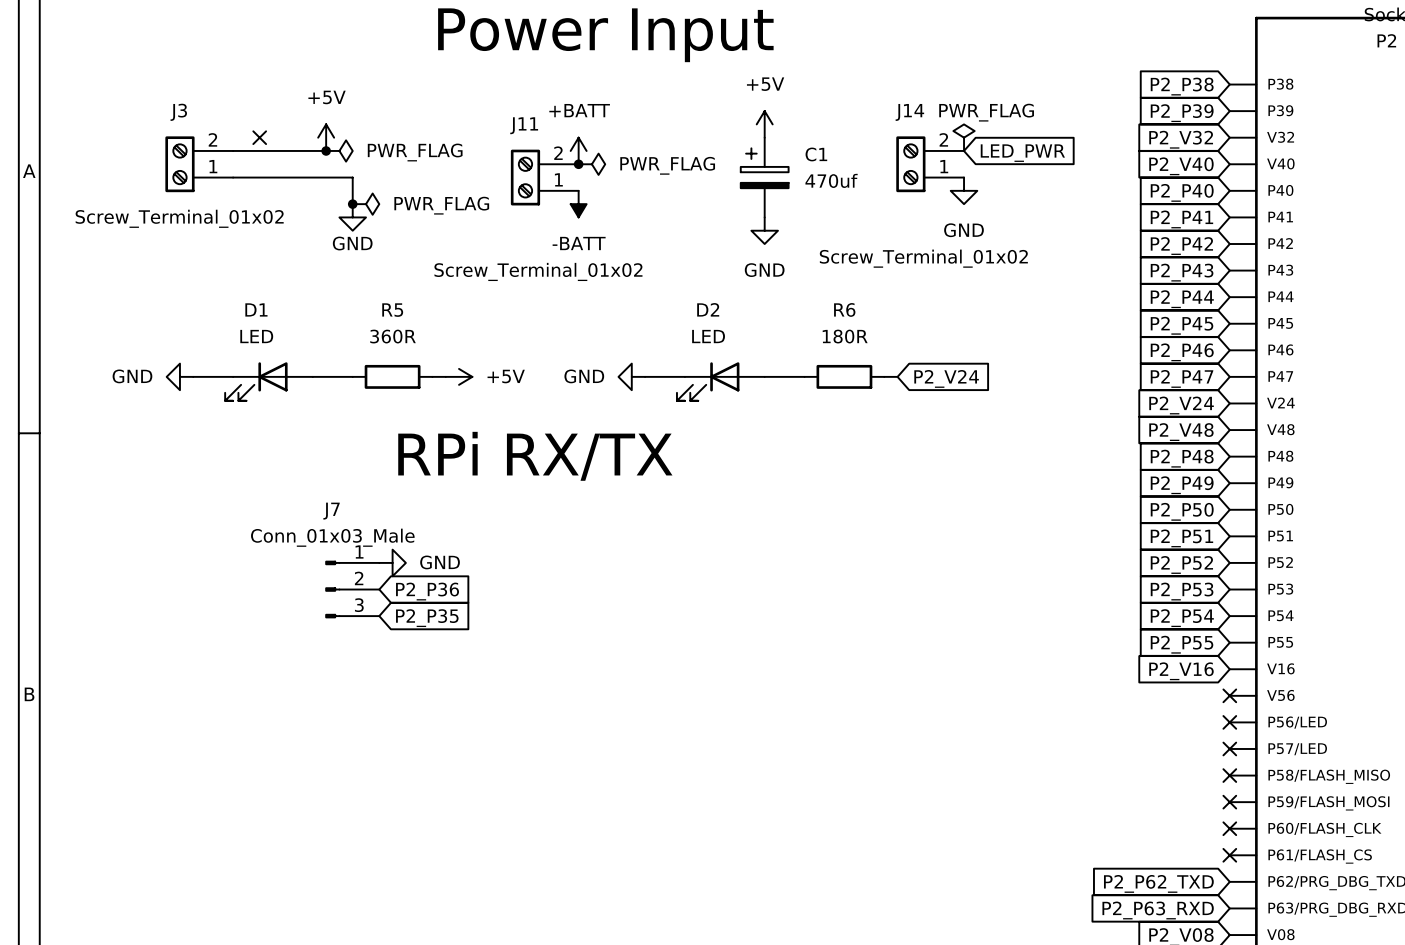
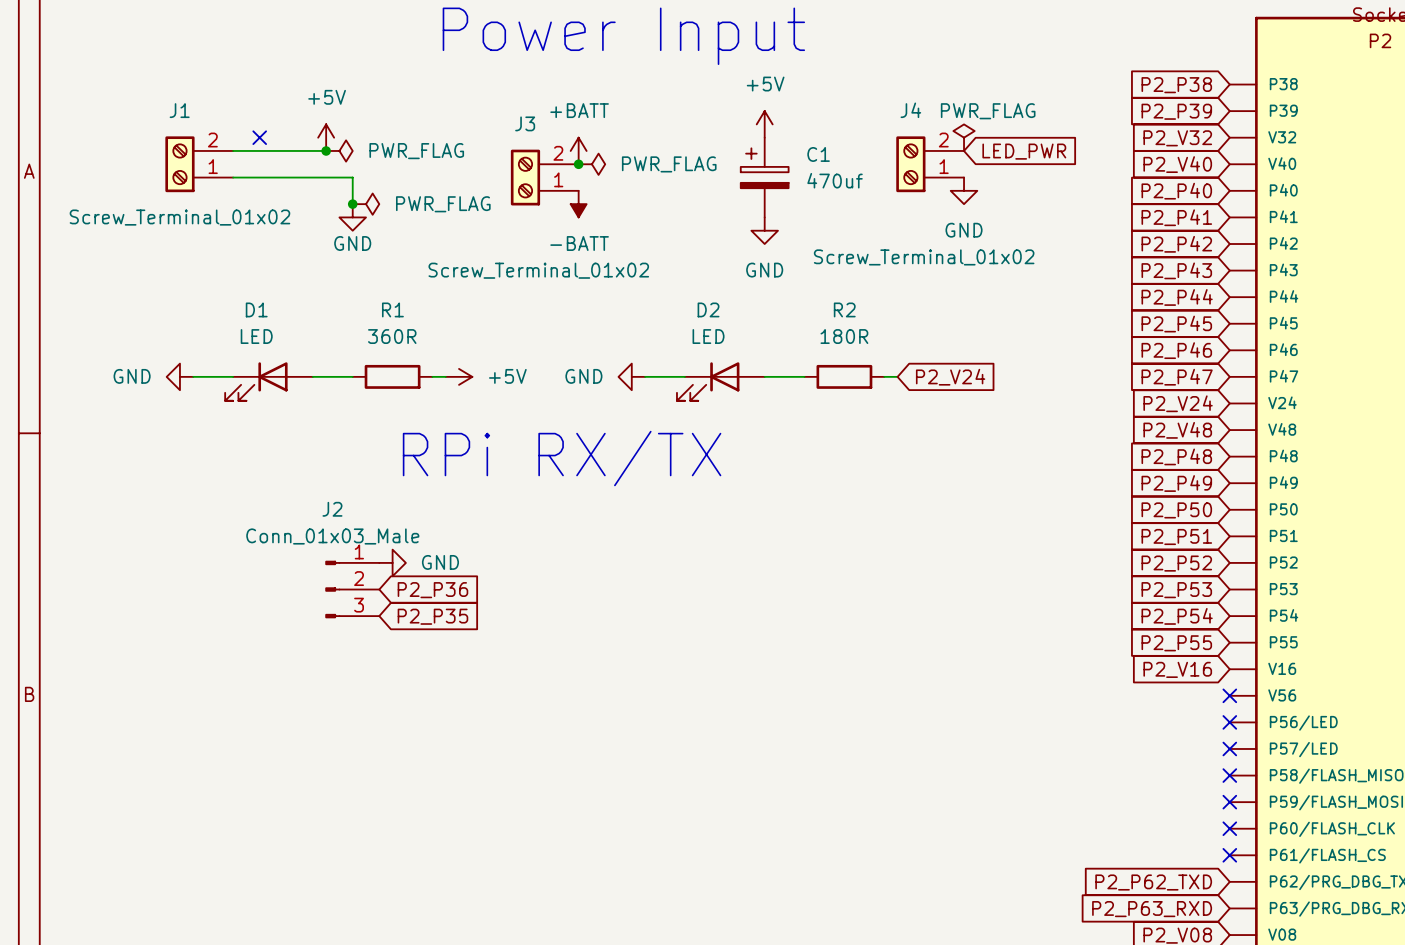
J3 name: J3 (178, 112) -> J1 (179, 110)
J14 name: J14 (909, 112) -> J4 (910, 110)
J11 name: J11 (524, 125) -> J3 (525, 123)
R6 name: R6 (844, 309) -> R2 (844, 309)
R5 name: R5 (392, 310) -> R1 (392, 309)
J7 name: J7 (331, 511) -> J2 (332, 509)

